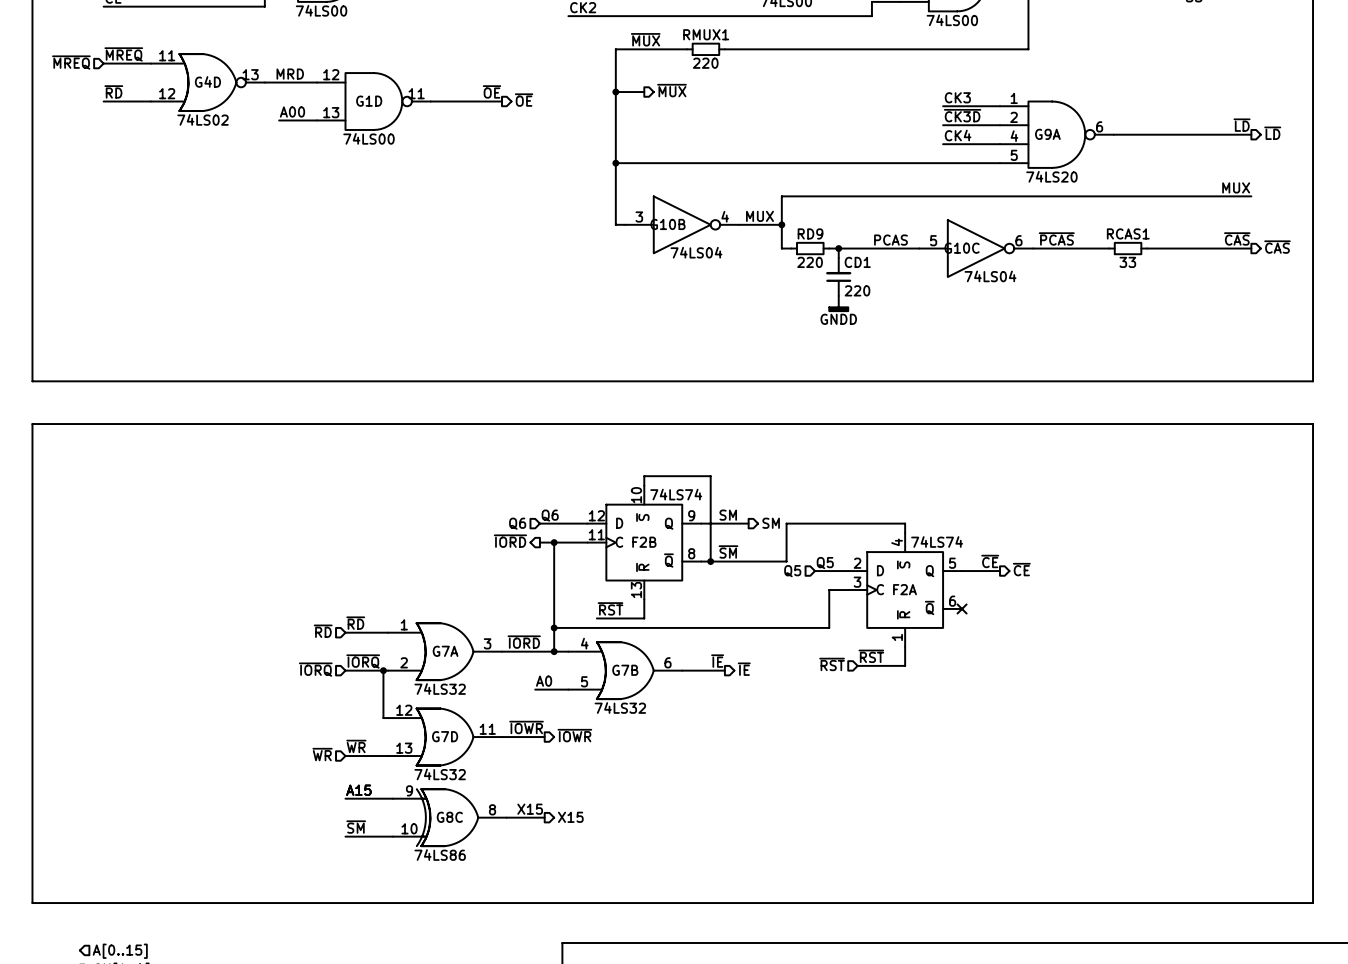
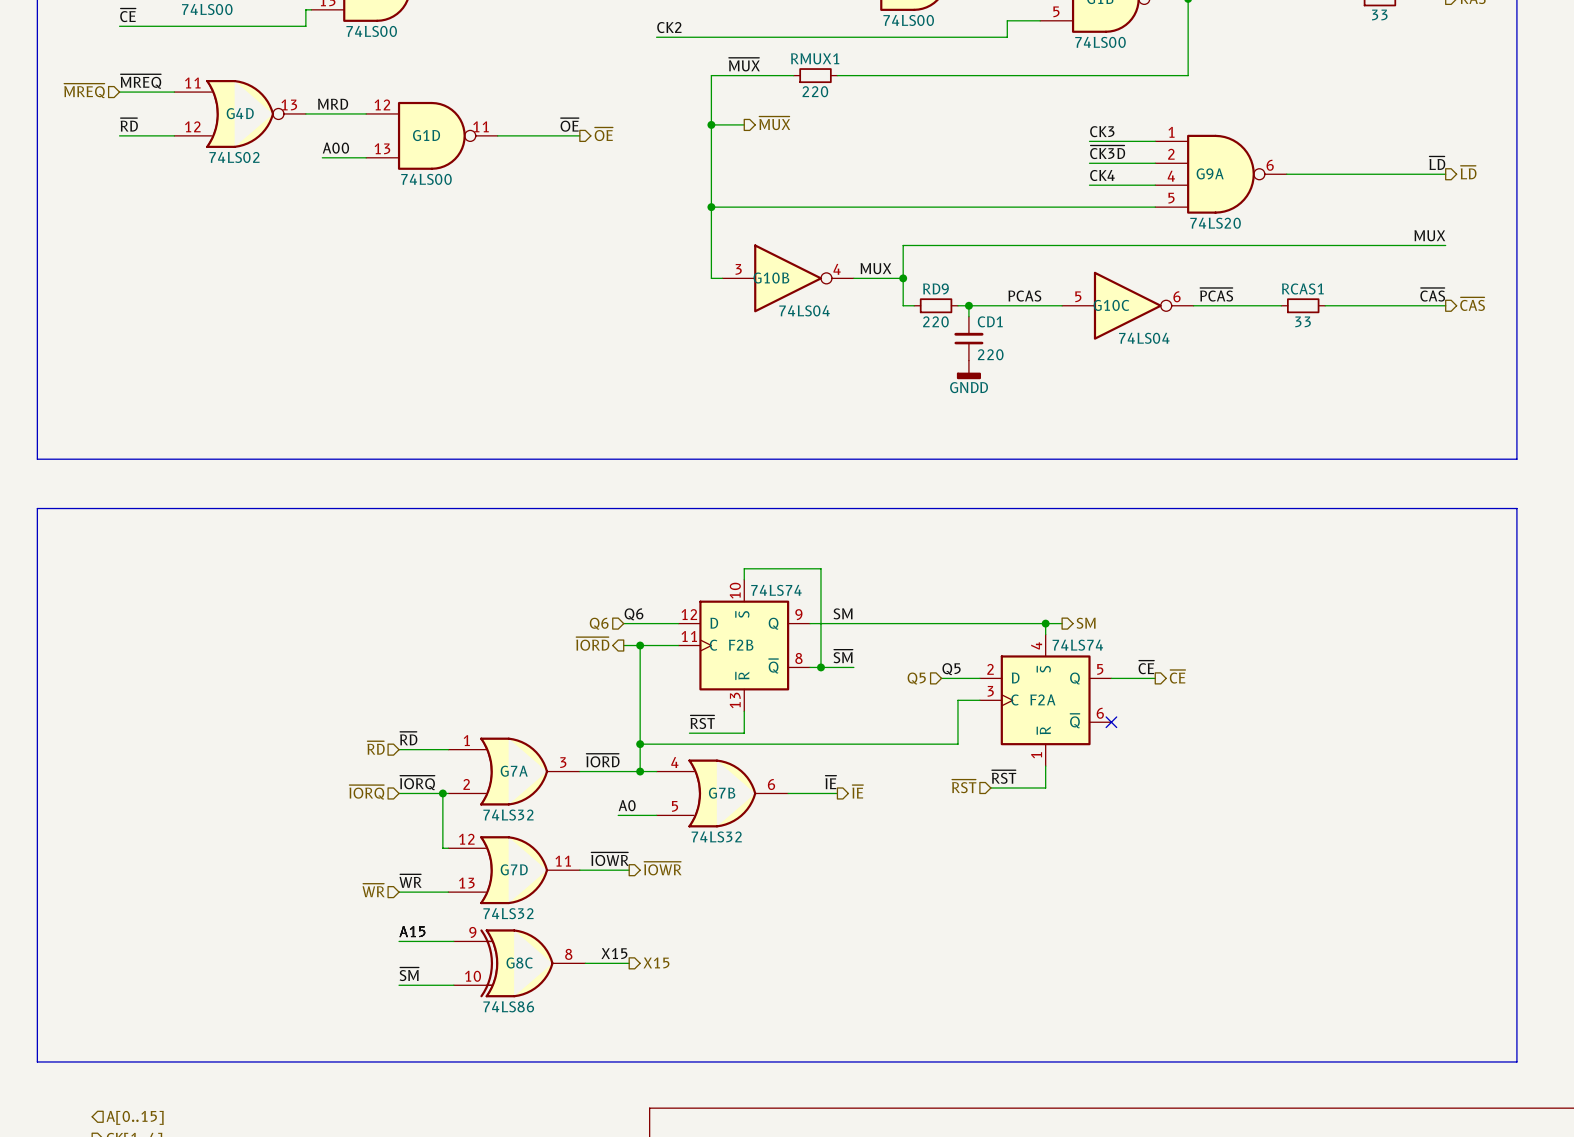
hierarchical label position: SM (771, 523) -> SM (1086, 623)
wire: (786, 523) (786, 561) (739, 561) -> (908, 623) (864, 623)
wire: none -> (1045, 623) (1062, 623)
junction: none -> (1045, 623)

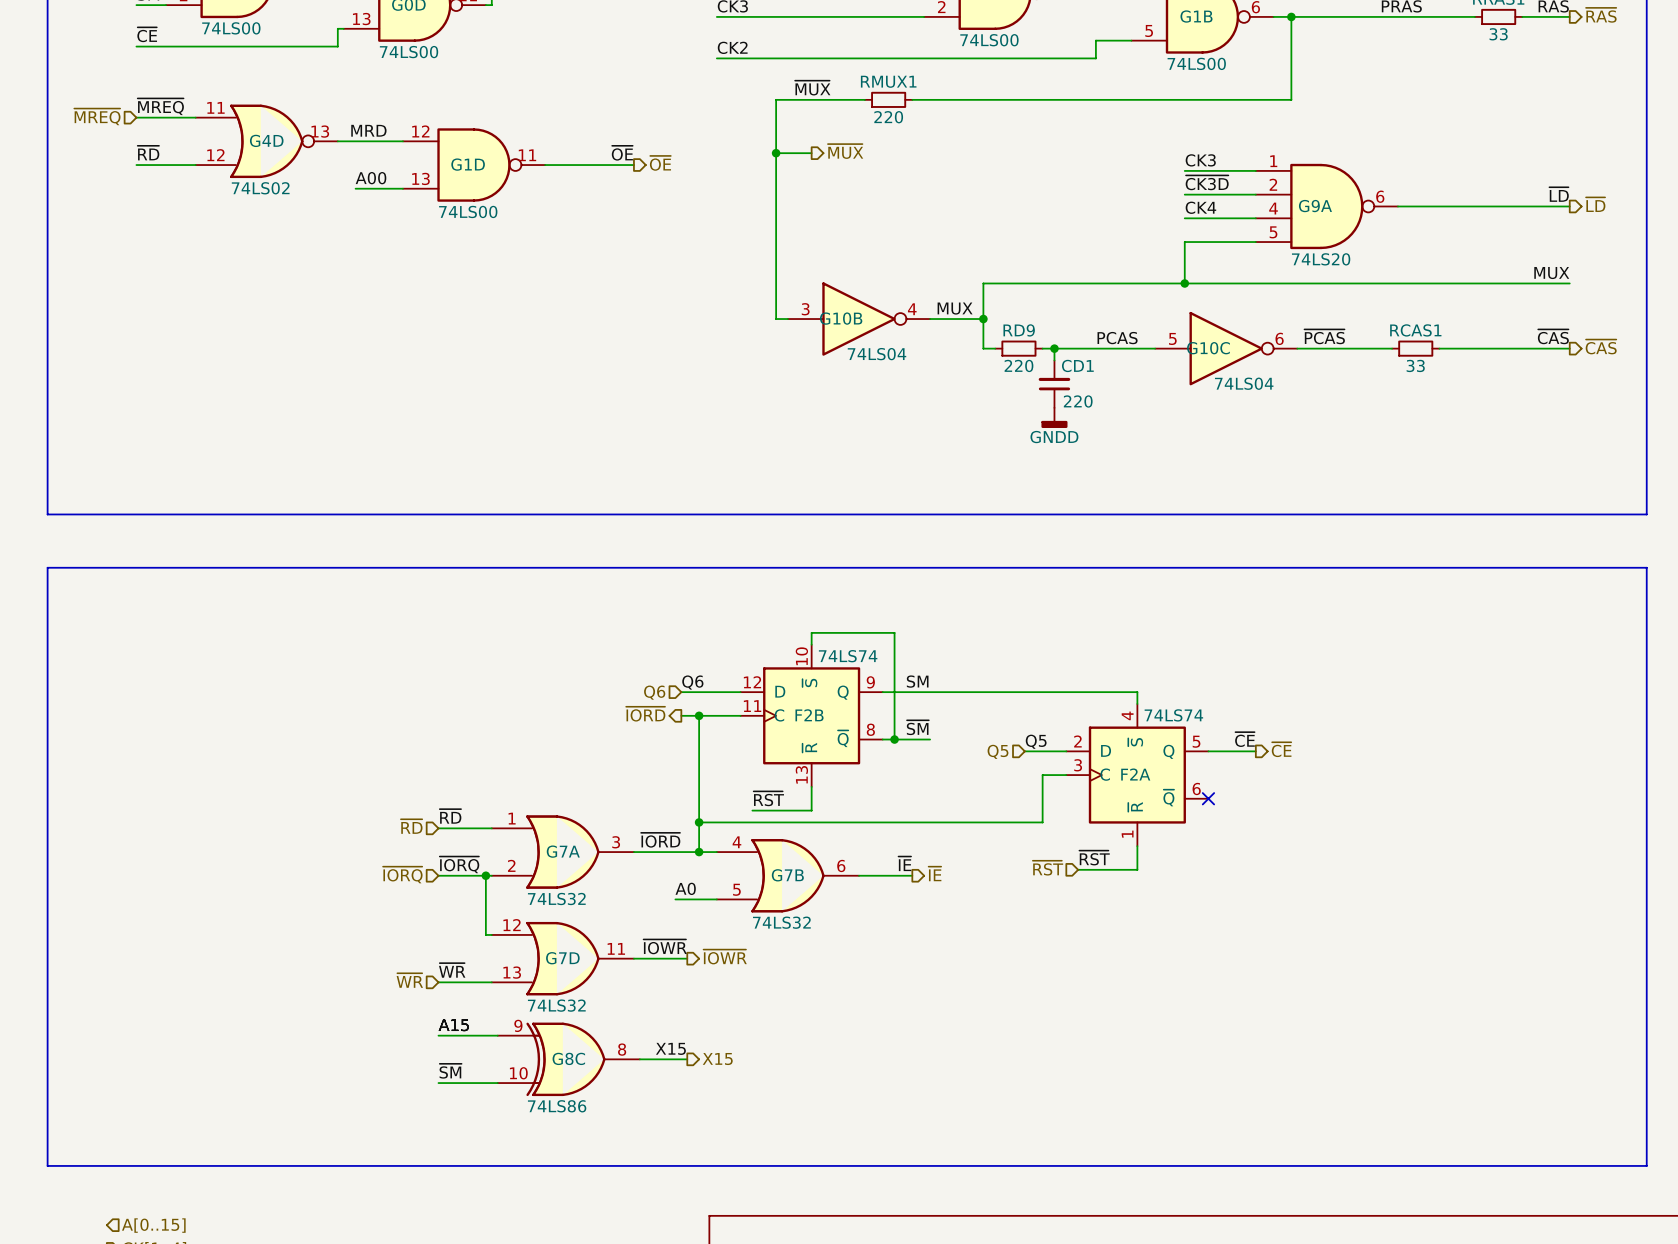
wire: (711, 207) (1089, 207) -> (1184, 283) (1184, 242)
junction: (711, 207) -> none
junction: none -> (1184, 283)
wire: (1045, 623) (1062, 623) -> none
junction: (1045, 623) -> none
hierarchical label: SM (1086, 623) -> none

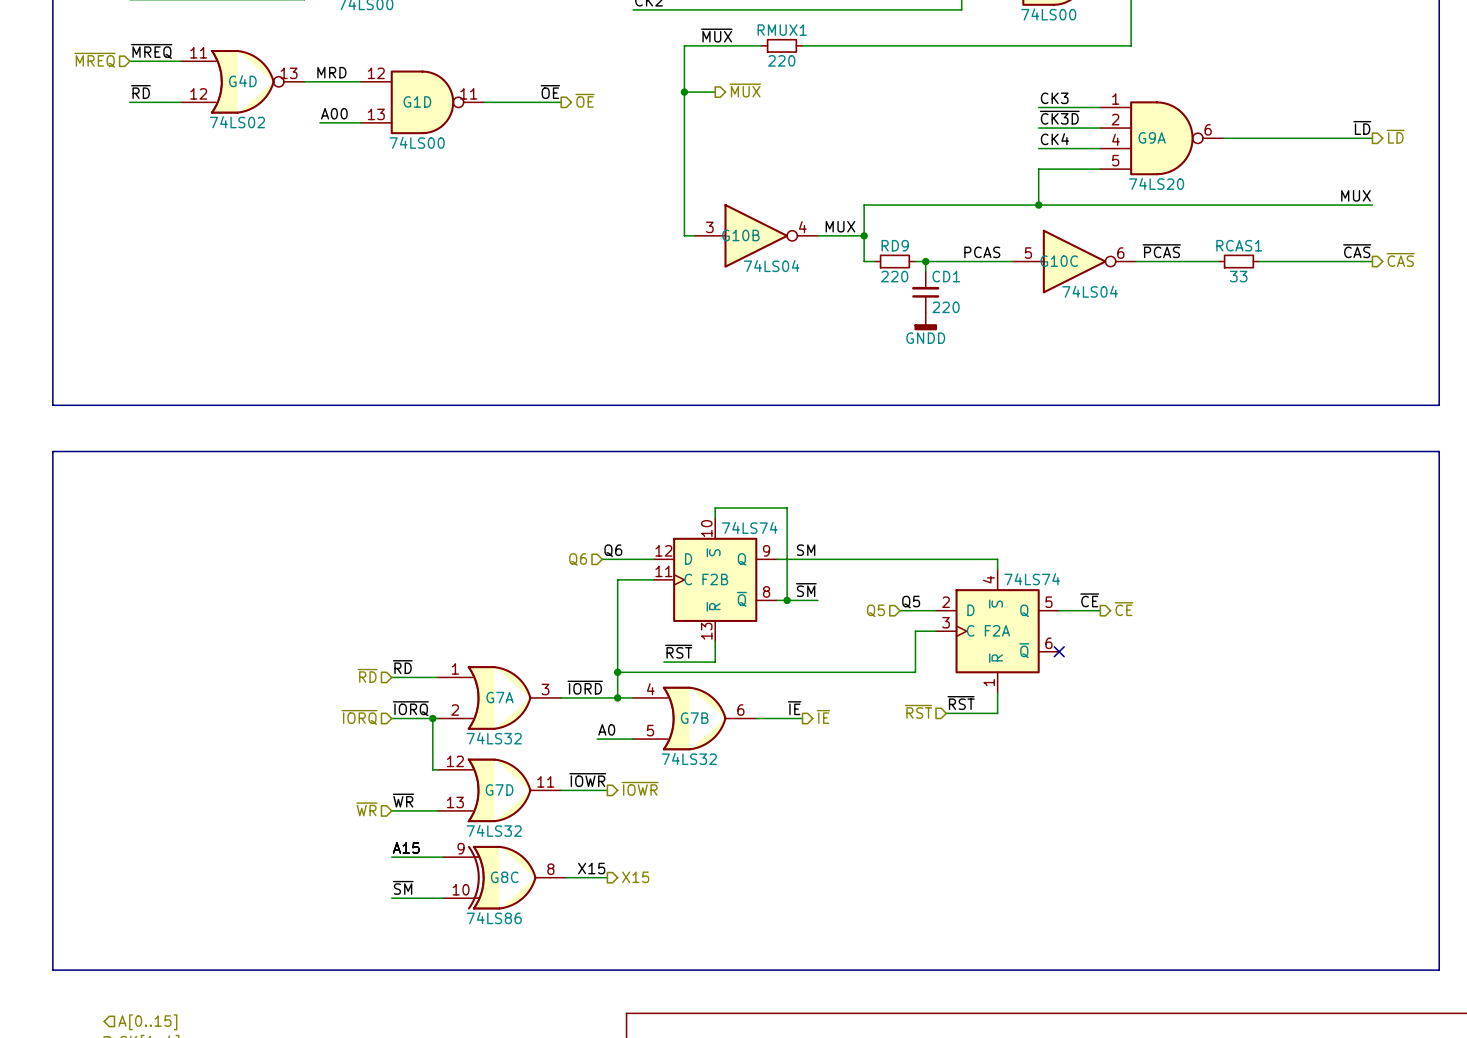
hierarchical label: ~{IORD} (645, 714) -> none
wire: (681, 715) (699, 715) -> none
junction: (699, 715) -> none

